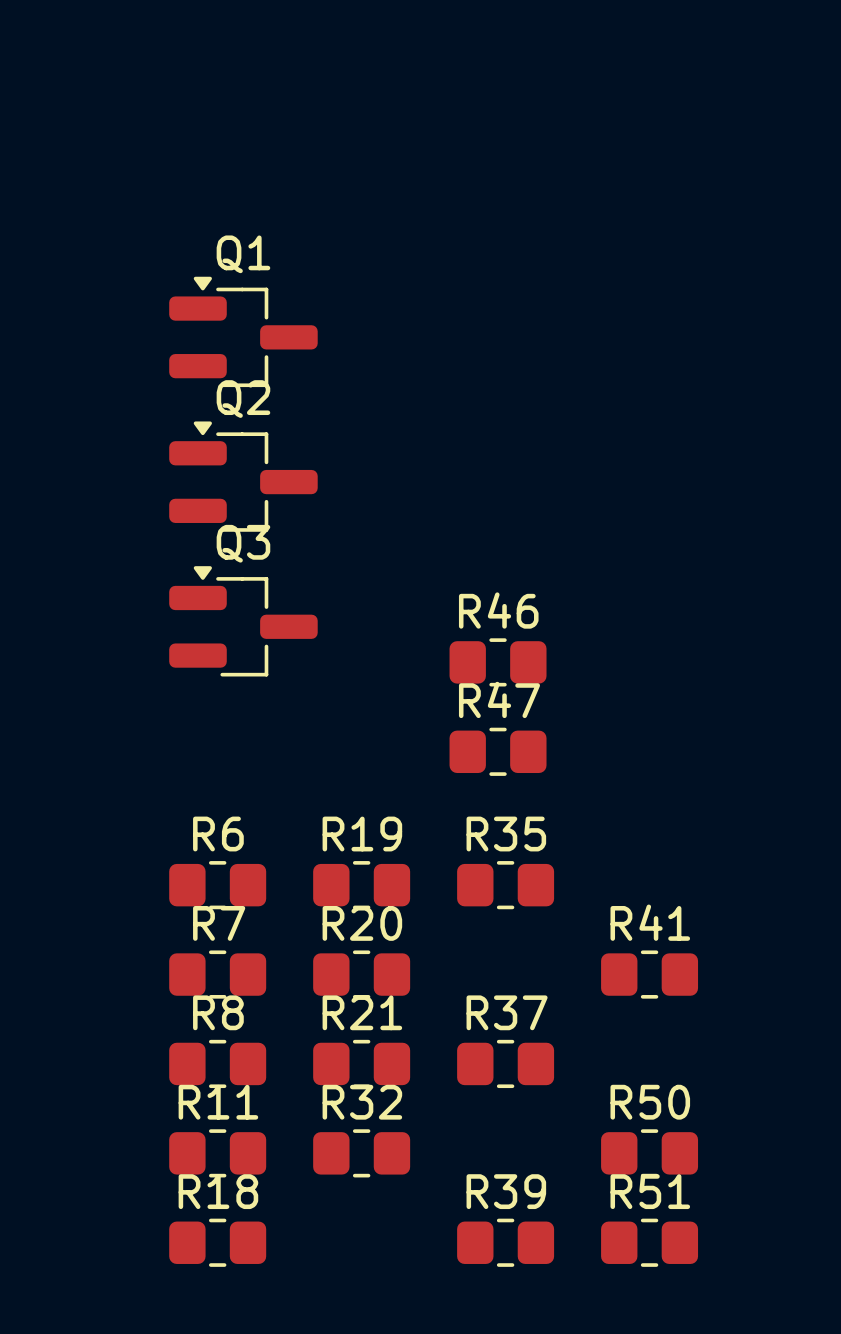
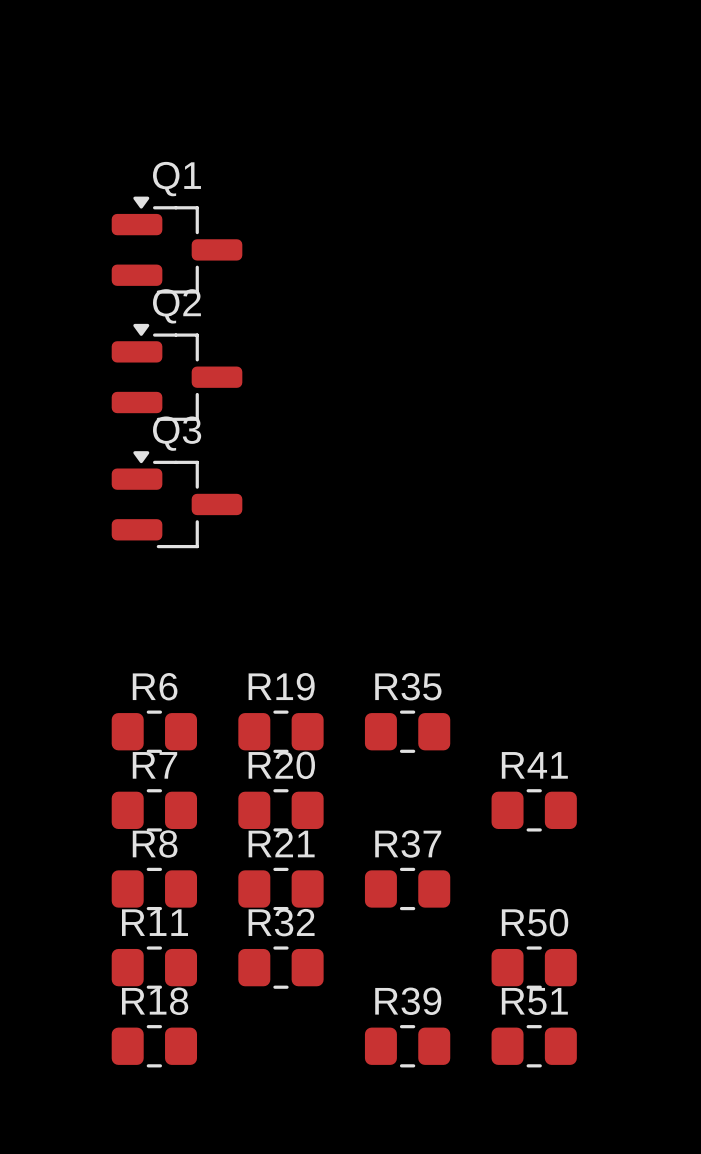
R46: (498, 662) -> none
R47: (498, 751) -> none

